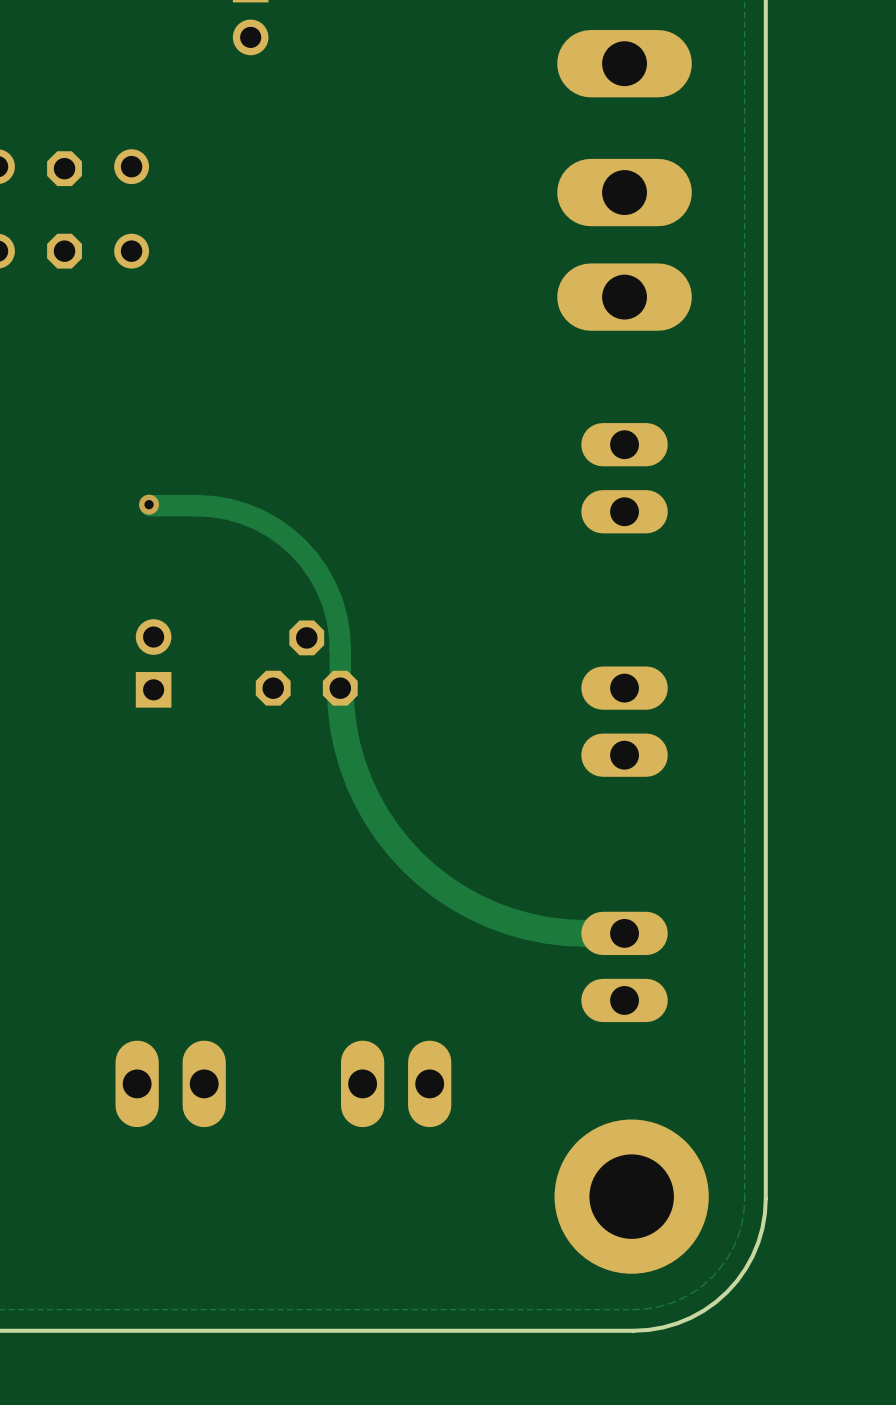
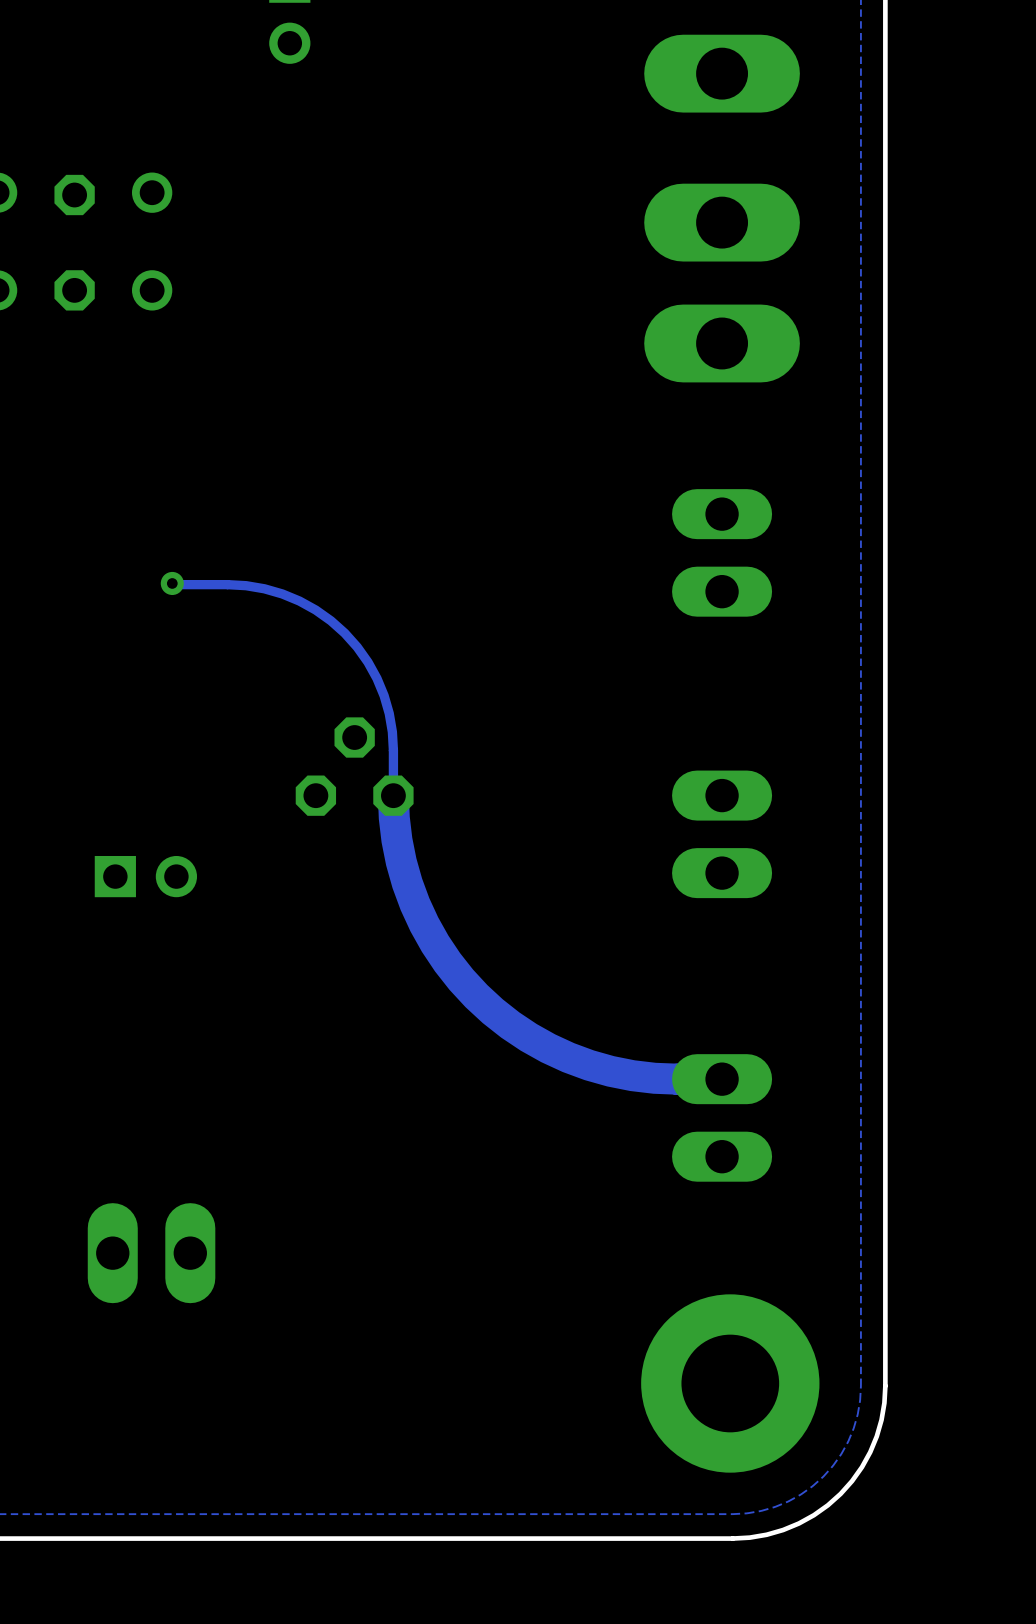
track width: thick (150, 505) (196, 505) (228, 509) (259, 519) (273, 527) (298, 547) (318, 572) (332, 601) (339, 633) (340, 688) -> thin (173, 584) (227, 584) (264, 588) (299, 601) (315, 610) (344, 633) (368, 662) (384, 695) (392, 731) (393, 795)
part rotation: 0° (153, 663) -> 90° clockwise (145, 876)
part position: (153, 663) -> (145, 876)
part position: (170, 1083) -> (151, 1253)
part: (396, 1083) -> none

